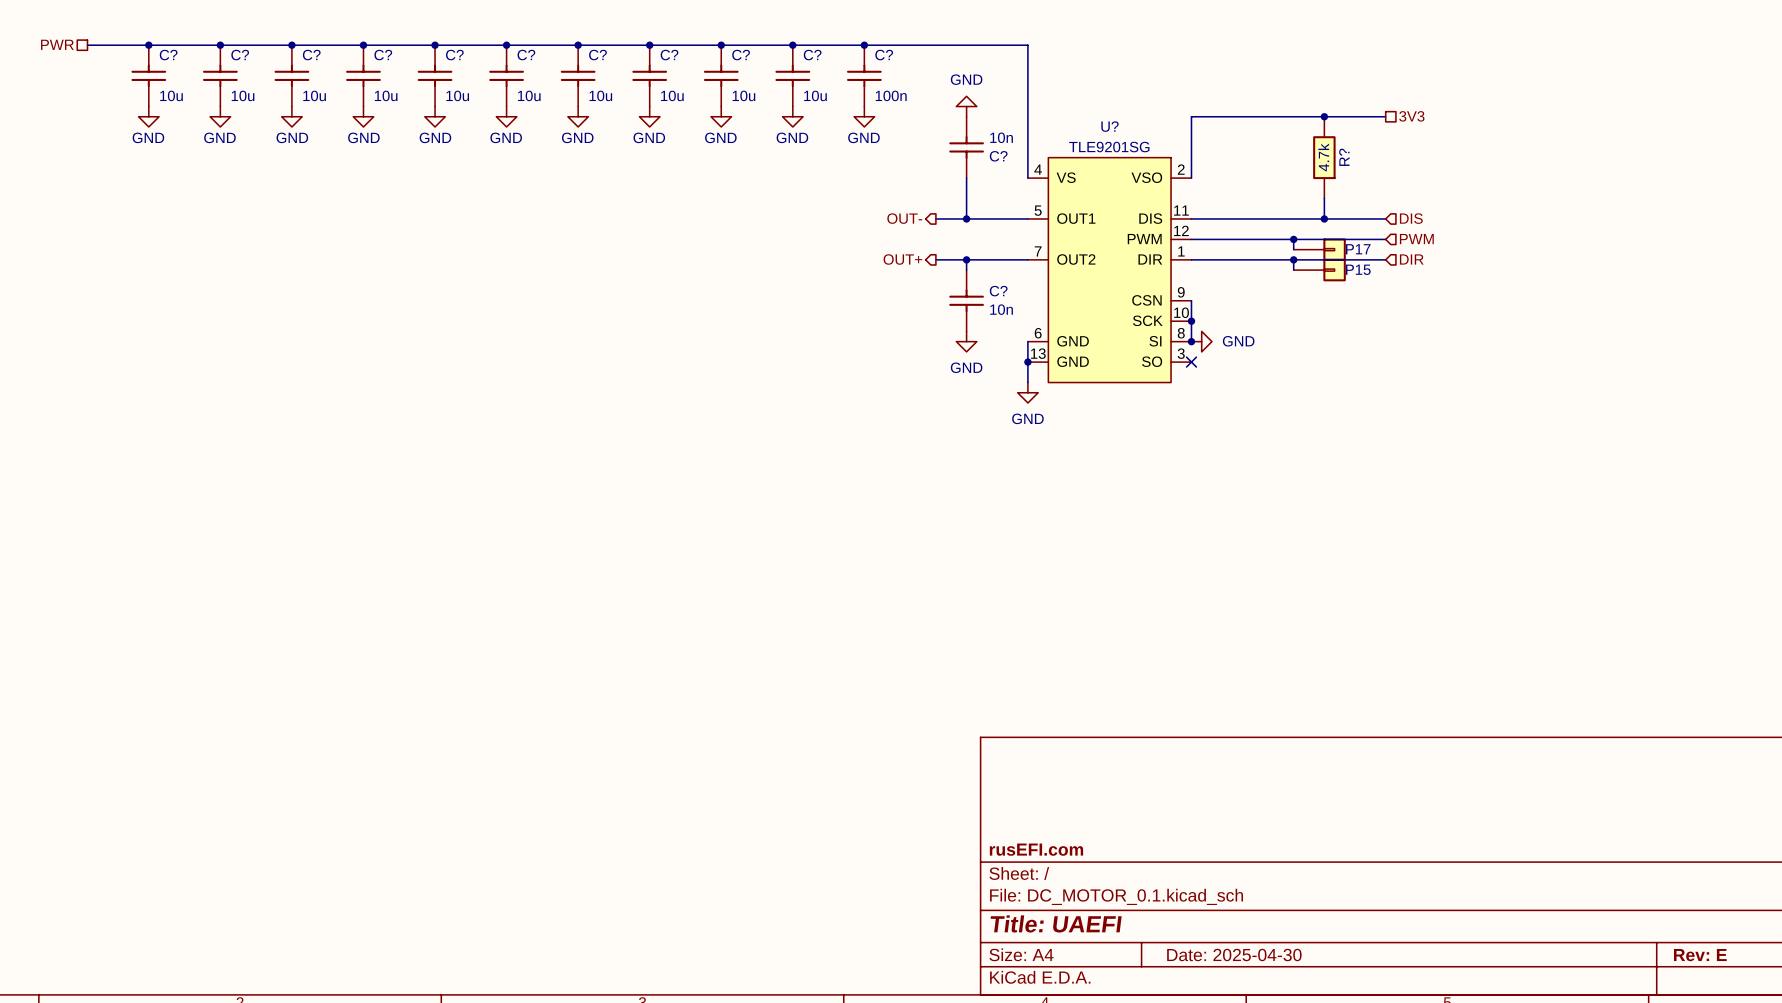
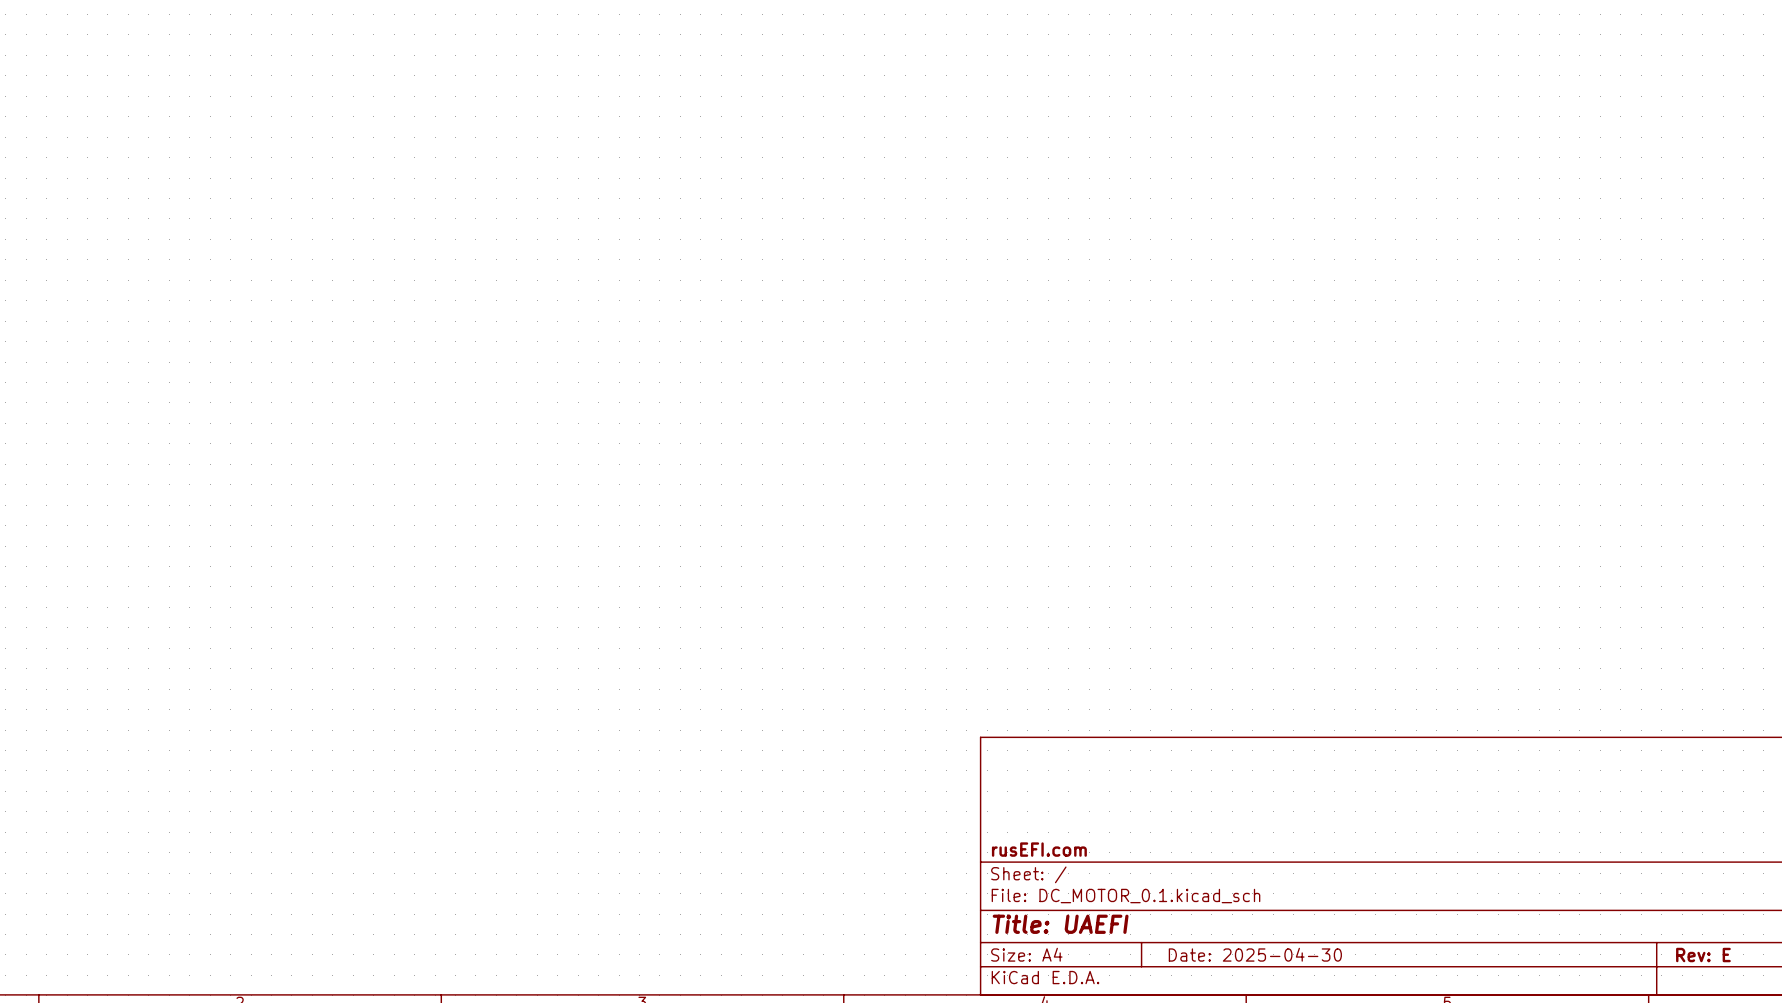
hierarchical label: PWR (57, 44) -> none
wire: (87, 45) (1027, 45) (1027, 178) -> none
junction: (148, 45) -> none
junction: (220, 45) -> none
junction: (291, 45) -> none
junction: (363, 45) -> none
junction: (435, 45) -> none
junction: (506, 45) -> none
junction: (578, 45) -> none
junction: (649, 45) -> none
junction: (721, 45) -> none
junction: (792, 45) -> none
junction: (864, 45) -> none
C?: 10u (148, 75) -> none
C?: 10u (220, 75) -> none
C?: 10u (291, 75) -> none
C?: 10u (363, 75) -> none
C?: 10u (435, 75) -> none
C?: 10u (506, 75) -> none
C?: 10u (578, 75) -> none
C?: 10u (649, 75) -> none
C?: 10u (721, 75) -> none
C?: 10u (792, 75) -> none
C?: 100n (864, 75) -> none
power symbol: GND (966, 106) -> none
power symbol: GND (148, 116) -> none
power symbol: GND (220, 116) -> none
power symbol: GND (291, 116) -> none
power symbol: GND (363, 116) -> none
power symbol: GND (435, 116) -> none
power symbol: GND (506, 116) -> none
power symbol: GND (578, 116) -> none
power symbol: GND (649, 116) -> none
power symbol: GND (721, 116) -> none
power symbol: GND (792, 116) -> none
power symbol: GND (864, 116) -> none
junction: (1324, 116) -> none
wire: (1385, 116) (1191, 116) (1191, 178) -> none
hierarchical label: 3V3 (1411, 116) -> none
C?: 10n (966, 147) -> none
R?: 4.7k (1324, 157) -> none
wire: (966, 178) (966, 218) -> none
wire: (1324, 198) (1324, 218) -> none
hierarchical label: OUT- (904, 218) -> none
wire: (935, 218) (1027, 218) -> none
junction: (966, 218) -> none
wire: (1191, 218) (1385, 218) -> none
junction: (1324, 218) -> none
hierarchical label: DIS (1411, 218) -> none
wire: (1191, 239) (1385, 239) -> none
wire: (1293, 239) (1293, 249) -> none
junction: (1293, 239) -> none
hierarchical label: PWM (1416, 239) -> none
P17: (1319, 249) -> none
hierarchical label: OUT+ (902, 259) -> none
wire: (935, 259) (1027, 259) -> none
wire: (966, 259) (966, 270) -> none
junction: (966, 259) -> none
wire: (1191, 259) (1385, 259) -> none
wire: (1293, 259) (1293, 270) -> none
junction: (1293, 259) -> none
hierarchical label: DIR (1411, 259) -> none
U?: TLE9201SG (1109, 270) -> none
P15: (1319, 270) -> none
C?: 10n (966, 300) -> none
wire: (1191, 300) (1191, 341) -> none
junction: (1191, 321) -> none
power symbol: GND (966, 341) -> none
wire: (1027, 341) (1027, 382) -> none
junction: (1191, 341) -> none
power symbol: GND (1201, 341) -> none
junction: (1027, 362) -> none
no-connect mark: (1191, 362) -> none
power symbol: GND (1027, 392) -> none

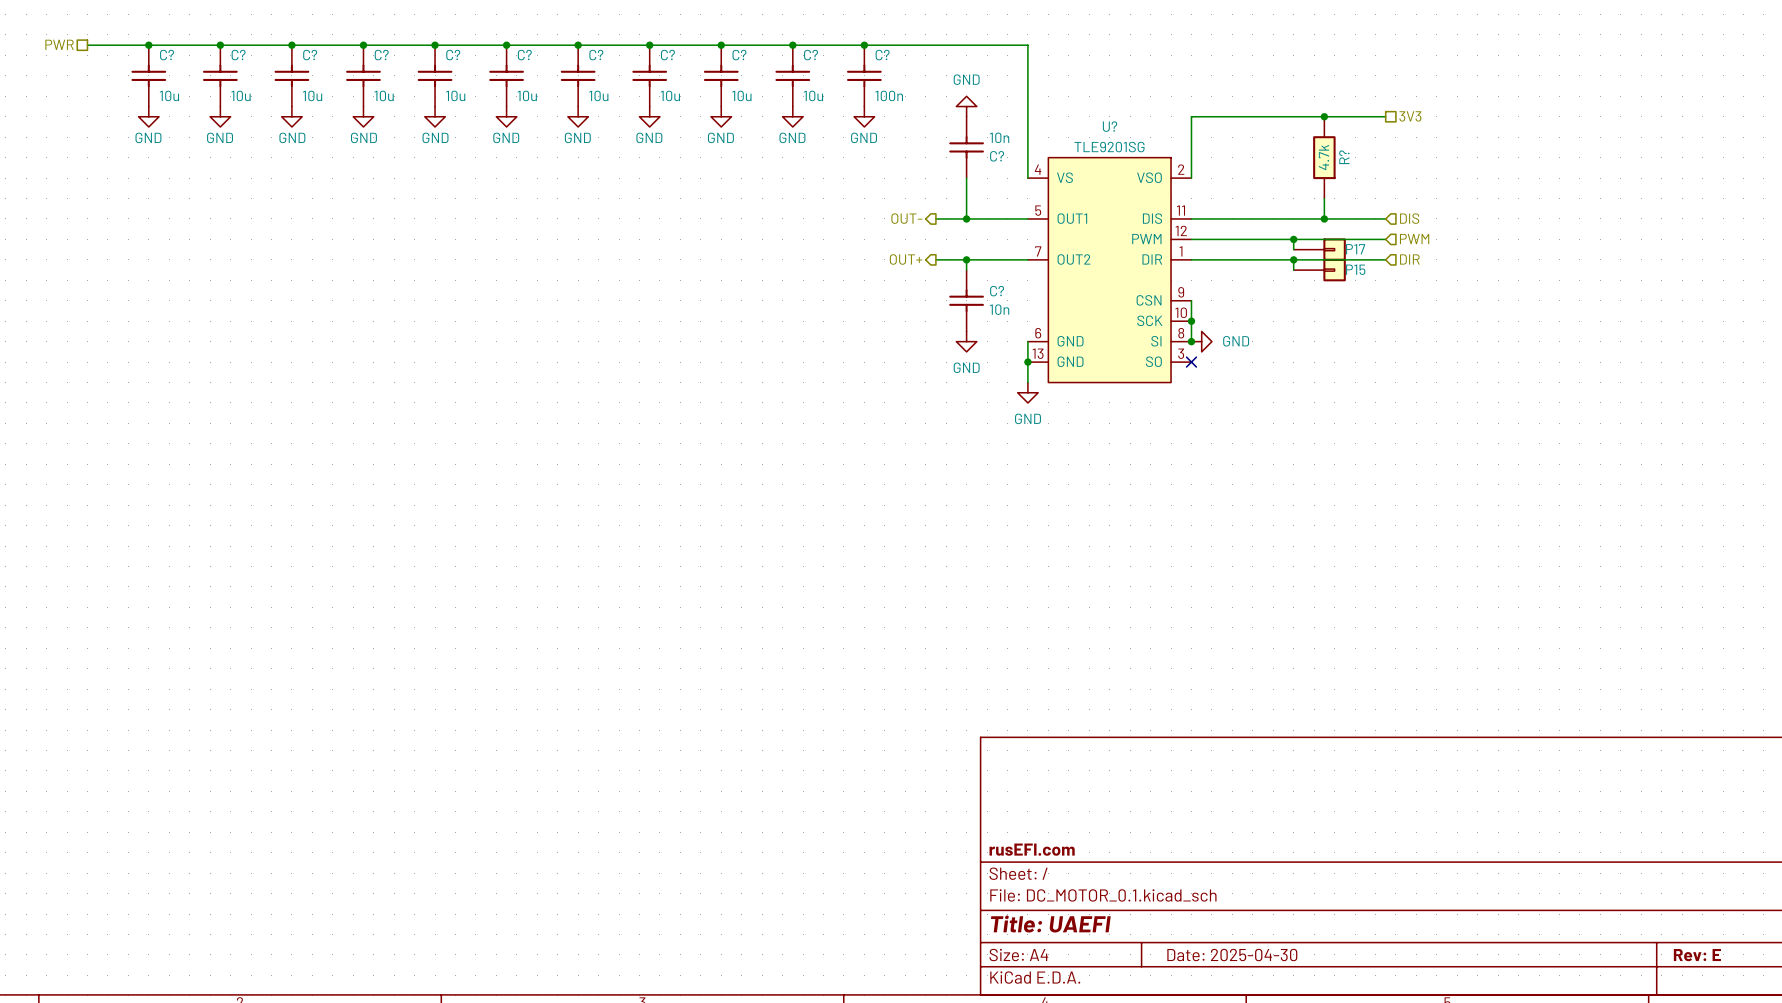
hierarchical label: none -> PWR (59, 44)
wire: none -> (87, 45) (1027, 45) (1027, 178)
junction: none -> (148, 45)
junction: none -> (220, 45)
junction: none -> (291, 45)
junction: none -> (363, 45)
junction: none -> (435, 45)
junction: none -> (506, 45)
junction: none -> (578, 45)
junction: none -> (649, 45)
junction: none -> (721, 45)
junction: none -> (792, 45)
junction: none -> (864, 45)
C?: none -> 10u (148, 75)
C?: none -> 10u (220, 75)
C?: none -> 10u (291, 75)
C?: none -> 10u (363, 75)
C?: none -> 10u (435, 75)
C?: none -> 10u (506, 75)
C?: none -> 10u (578, 75)
C?: none -> 10u (649, 75)
C?: none -> 10u (721, 75)
C?: none -> 10u (792, 75)
C?: none -> 100n (864, 75)
power symbol: none -> GND (966, 106)
power symbol: none -> GND (148, 116)
power symbol: none -> GND (220, 116)
power symbol: none -> GND (291, 116)
power symbol: none -> GND (363, 116)
power symbol: none -> GND (435, 116)
power symbol: none -> GND (506, 116)
power symbol: none -> GND (578, 116)
power symbol: none -> GND (649, 116)
power symbol: none -> GND (721, 116)
power symbol: none -> GND (792, 116)
power symbol: none -> GND (864, 116)
junction: none -> (1324, 116)
wire: none -> (1385, 116) (1191, 116) (1191, 178)
hierarchical label: none -> 3V3 (1410, 116)
C?: none -> 10n (966, 147)
R?: none -> 4.7k (1324, 157)
wire: none -> (966, 178) (966, 218)
wire: none -> (1324, 198) (1324, 218)
hierarchical label: none -> OUT- (906, 218)
wire: none -> (935, 218) (1027, 218)
junction: none -> (966, 218)
wire: none -> (1191, 218) (1385, 218)
junction: none -> (1324, 218)
hierarchical label: none -> DIS (1409, 218)
wire: none -> (1191, 239) (1385, 239)
wire: none -> (1293, 239) (1293, 249)
junction: none -> (1293, 239)
hierarchical label: none -> PWM (1414, 239)
P17: none -> (1319, 249)
hierarchical label: none -> OUT+ (906, 259)
wire: none -> (935, 259) (1027, 259)
wire: none -> (966, 259) (966, 270)
junction: none -> (966, 259)
wire: none -> (1191, 259) (1385, 259)
wire: none -> (1293, 259) (1293, 270)
junction: none -> (1293, 259)
hierarchical label: none -> DIR (1409, 259)
U?: none -> TLE9201SG (1109, 270)
P15: none -> (1319, 270)
C?: none -> 10n (966, 300)
wire: none -> (1191, 300) (1191, 341)
junction: none -> (1191, 321)
power symbol: none -> GND (966, 341)
wire: none -> (1027, 341) (1027, 382)
junction: none -> (1191, 341)
power symbol: none -> GND (1201, 341)
junction: none -> (1027, 362)
no-connect mark: none -> (1191, 362)
power symbol: none -> GND (1027, 392)

